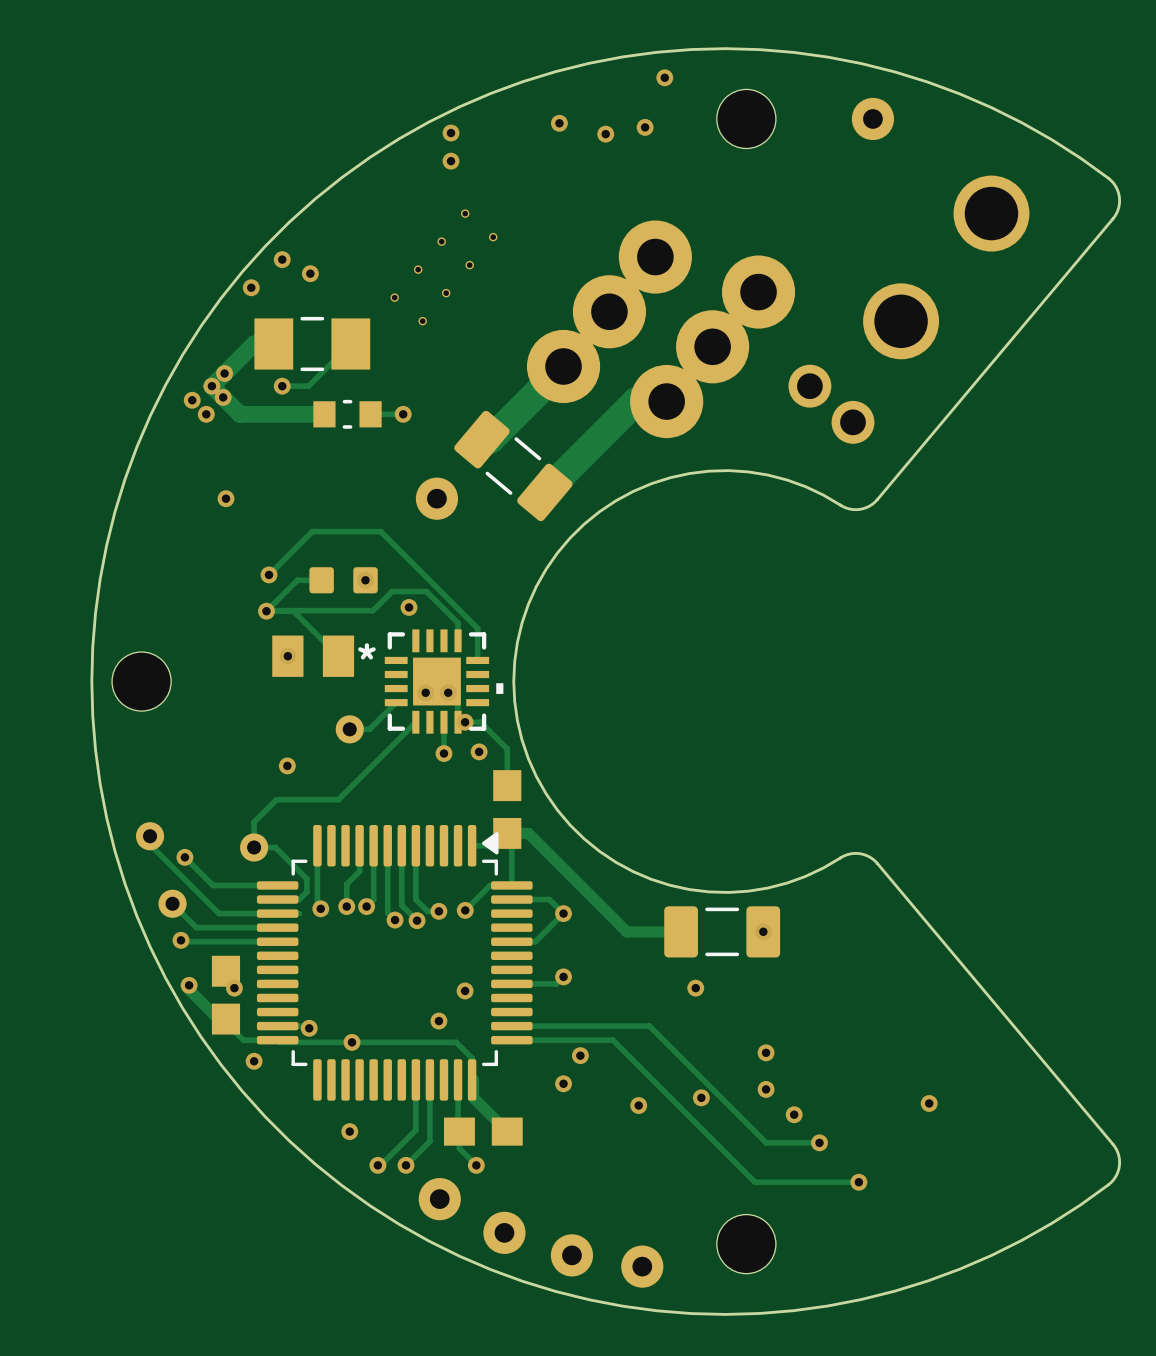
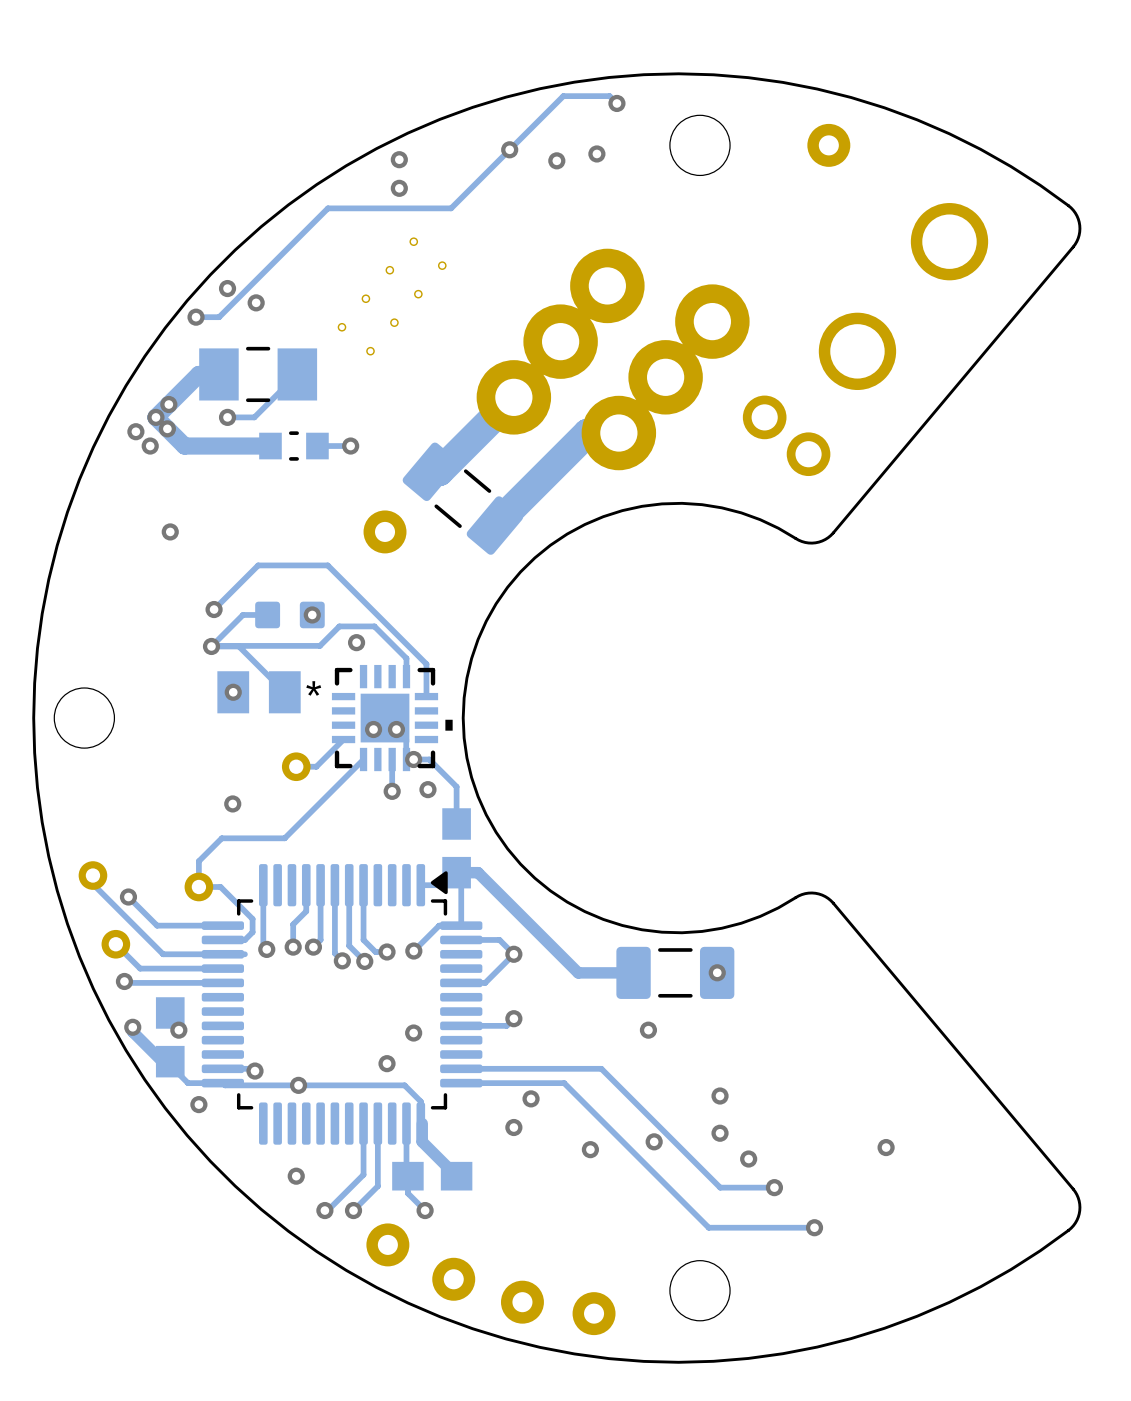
track: none -> (616, 103) (609, 96) (563, 96) (451, 208) (327, 208) (219, 317) (196, 317)

